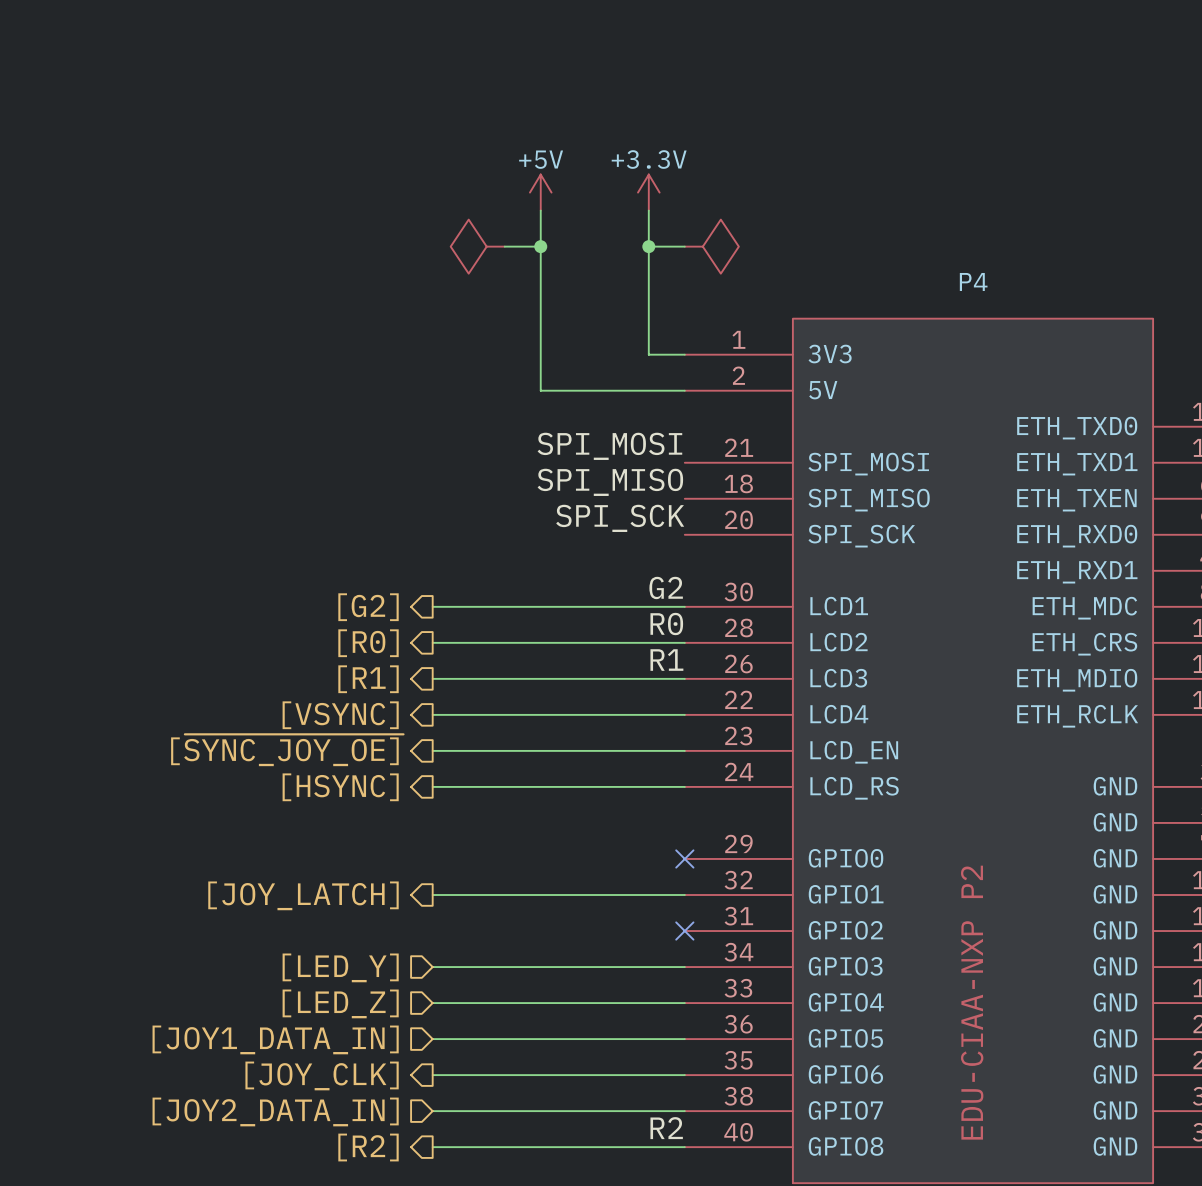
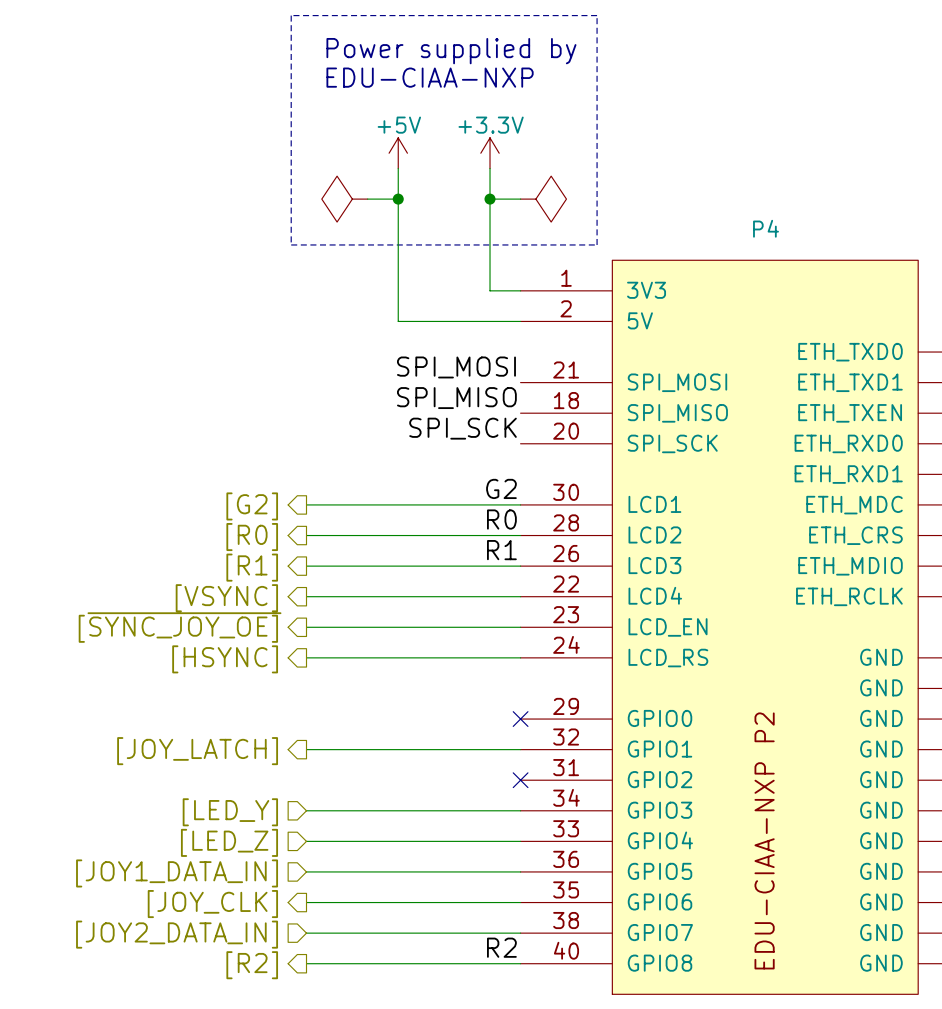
line: none -> (291, 15) (291, 244) (597, 244) (597, 15) (291, 15)
text: none -> Power supplied by (451, 51)
text: none -> EDU-CIAA-NXP (430, 77)

